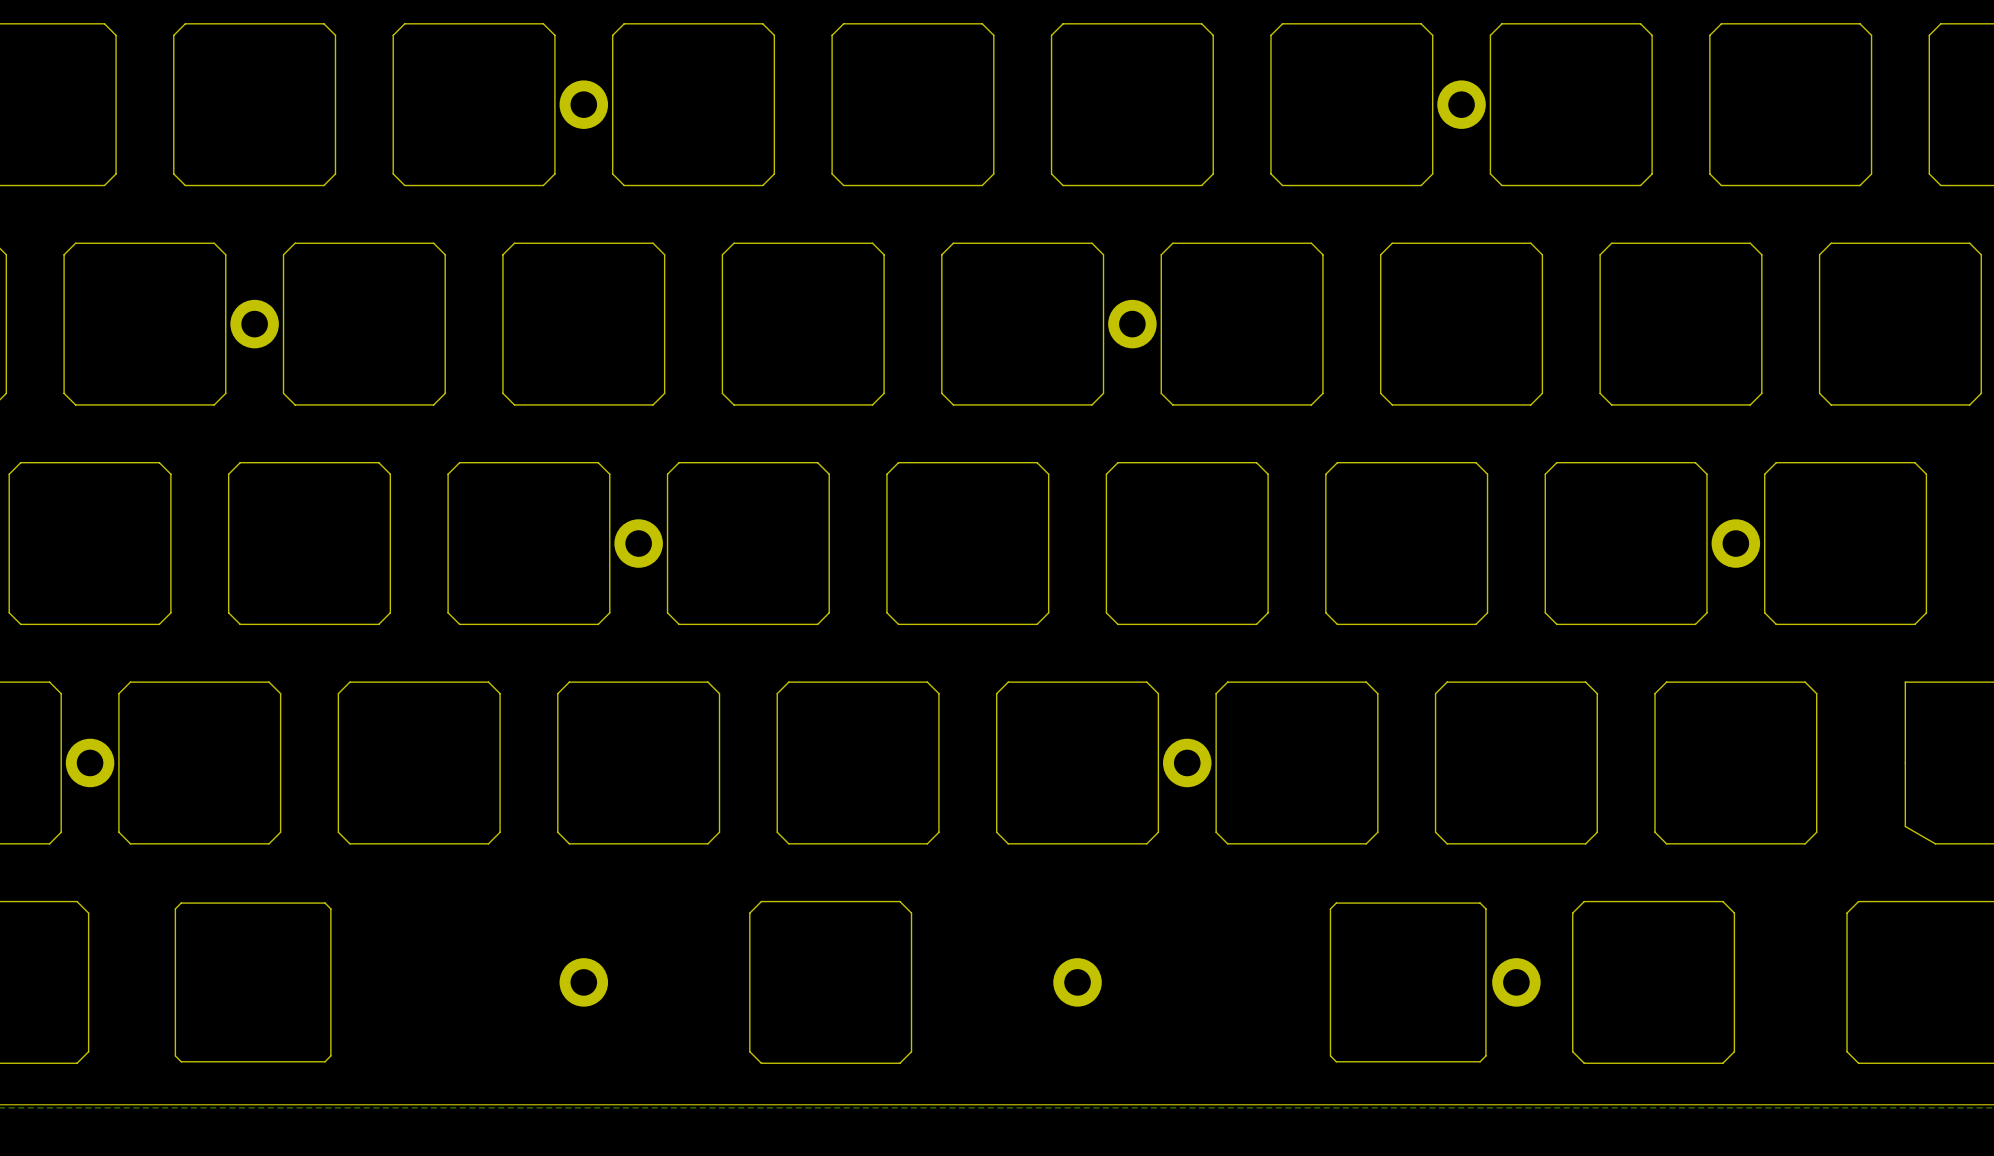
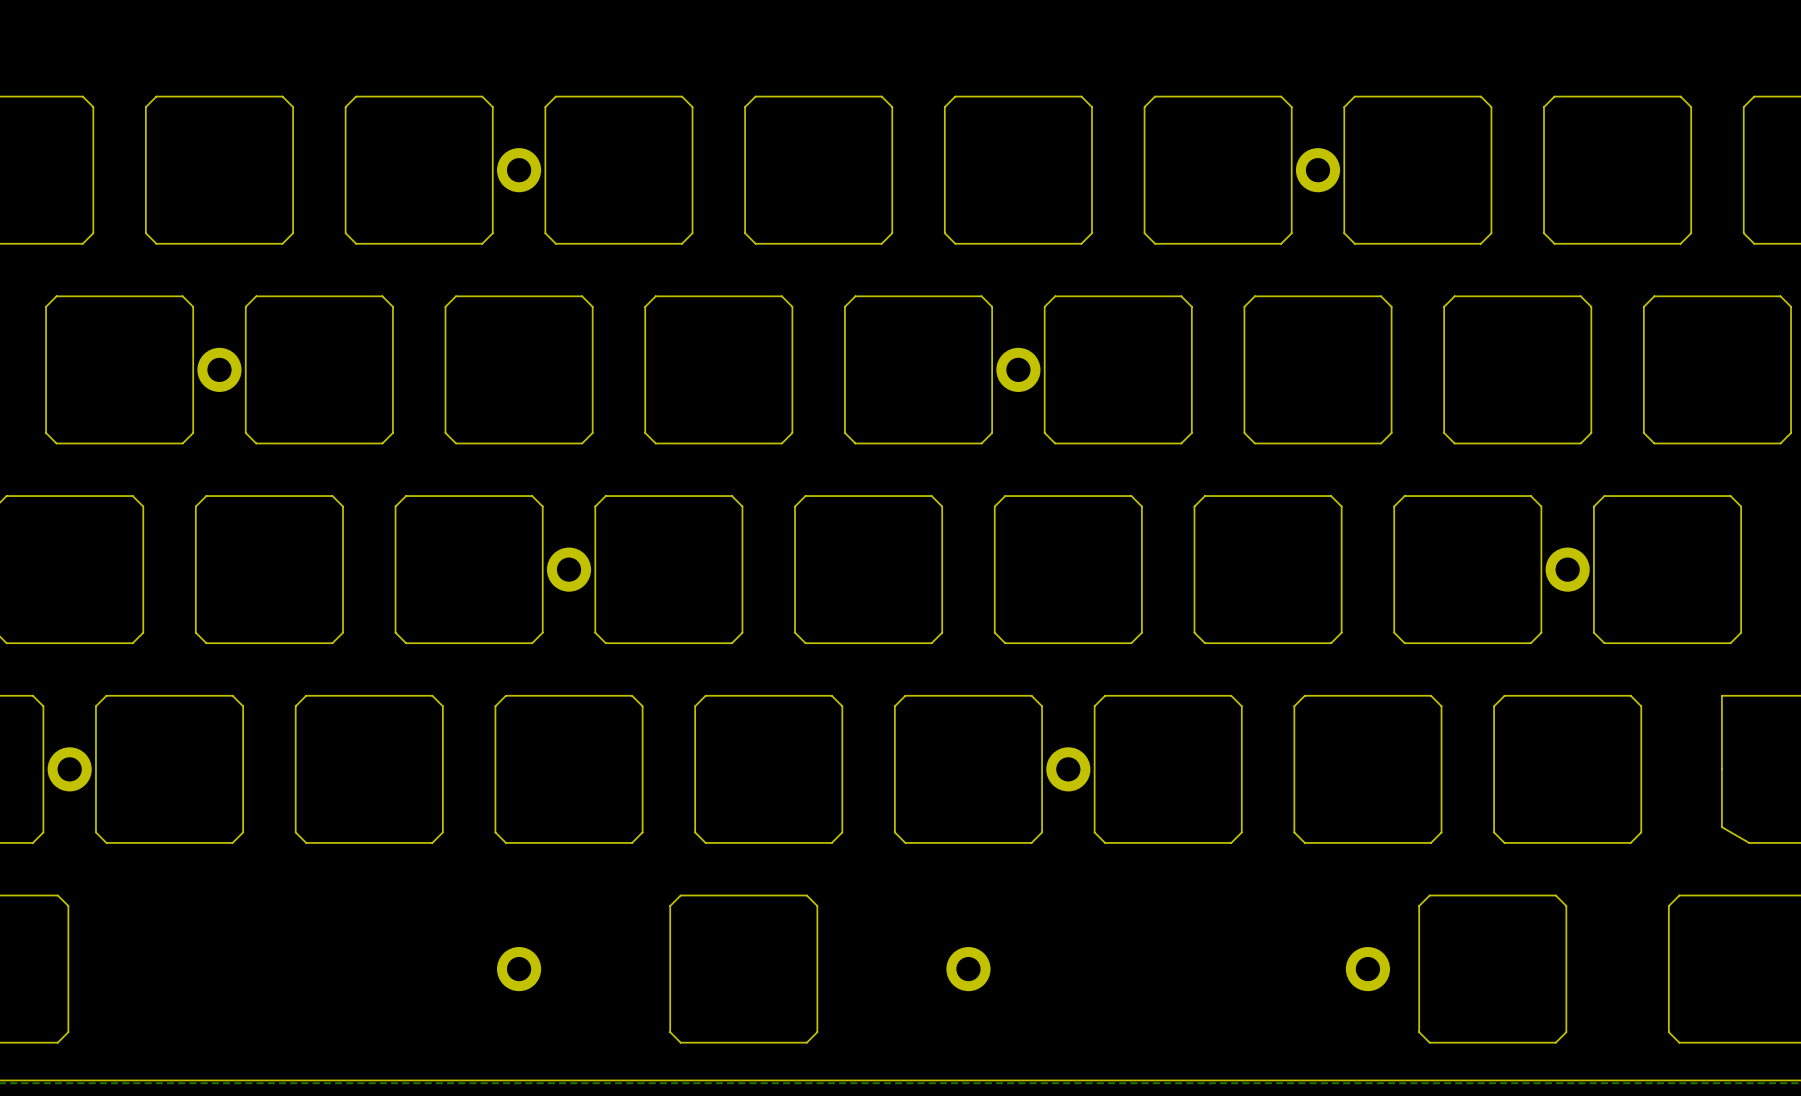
drawing: [174, 902, 1487, 1063] -> none

